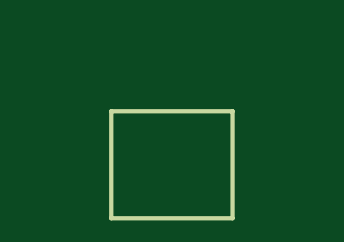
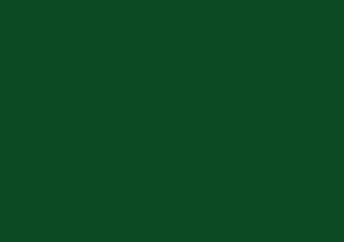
part: (171, 164) -> none

